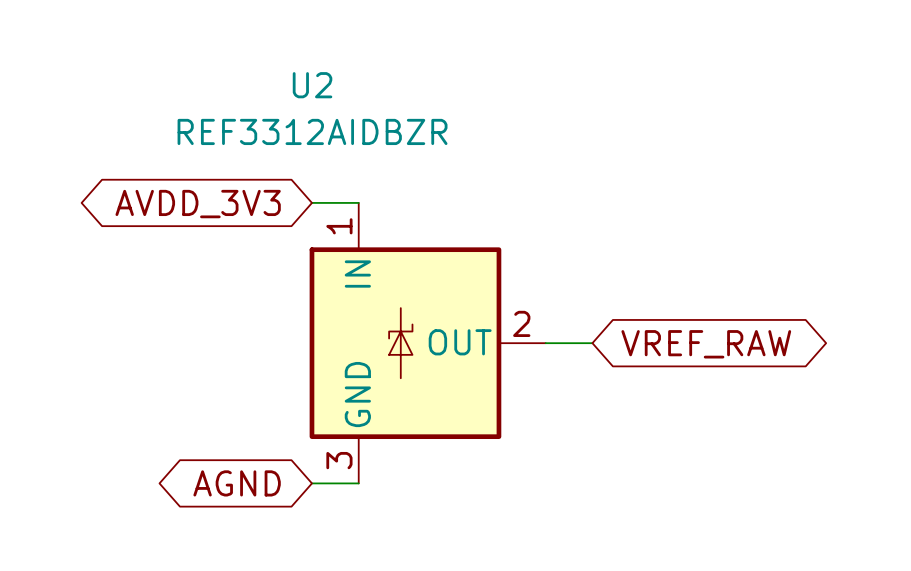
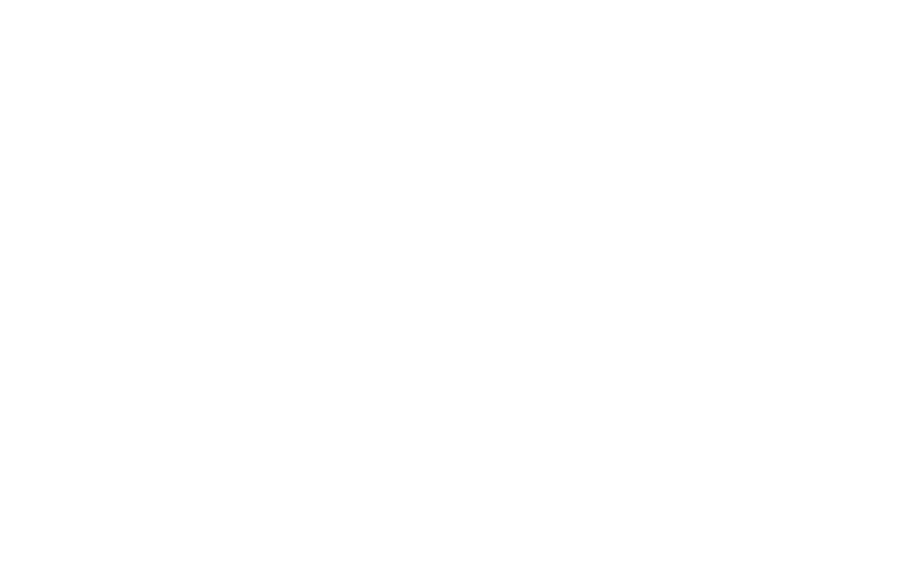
wire: (311, 202) (358, 202) -> none
global label: AVDD_3V3 (198, 204) -> none
U2: REF3312AIDBZR (427, 343) -> none
wire: (545, 343) (592, 343) -> none
global label: VREF_RAW (706, 344) -> none
global label: AGND (237, 483) -> none
wire: (311, 483) (358, 483) -> none

